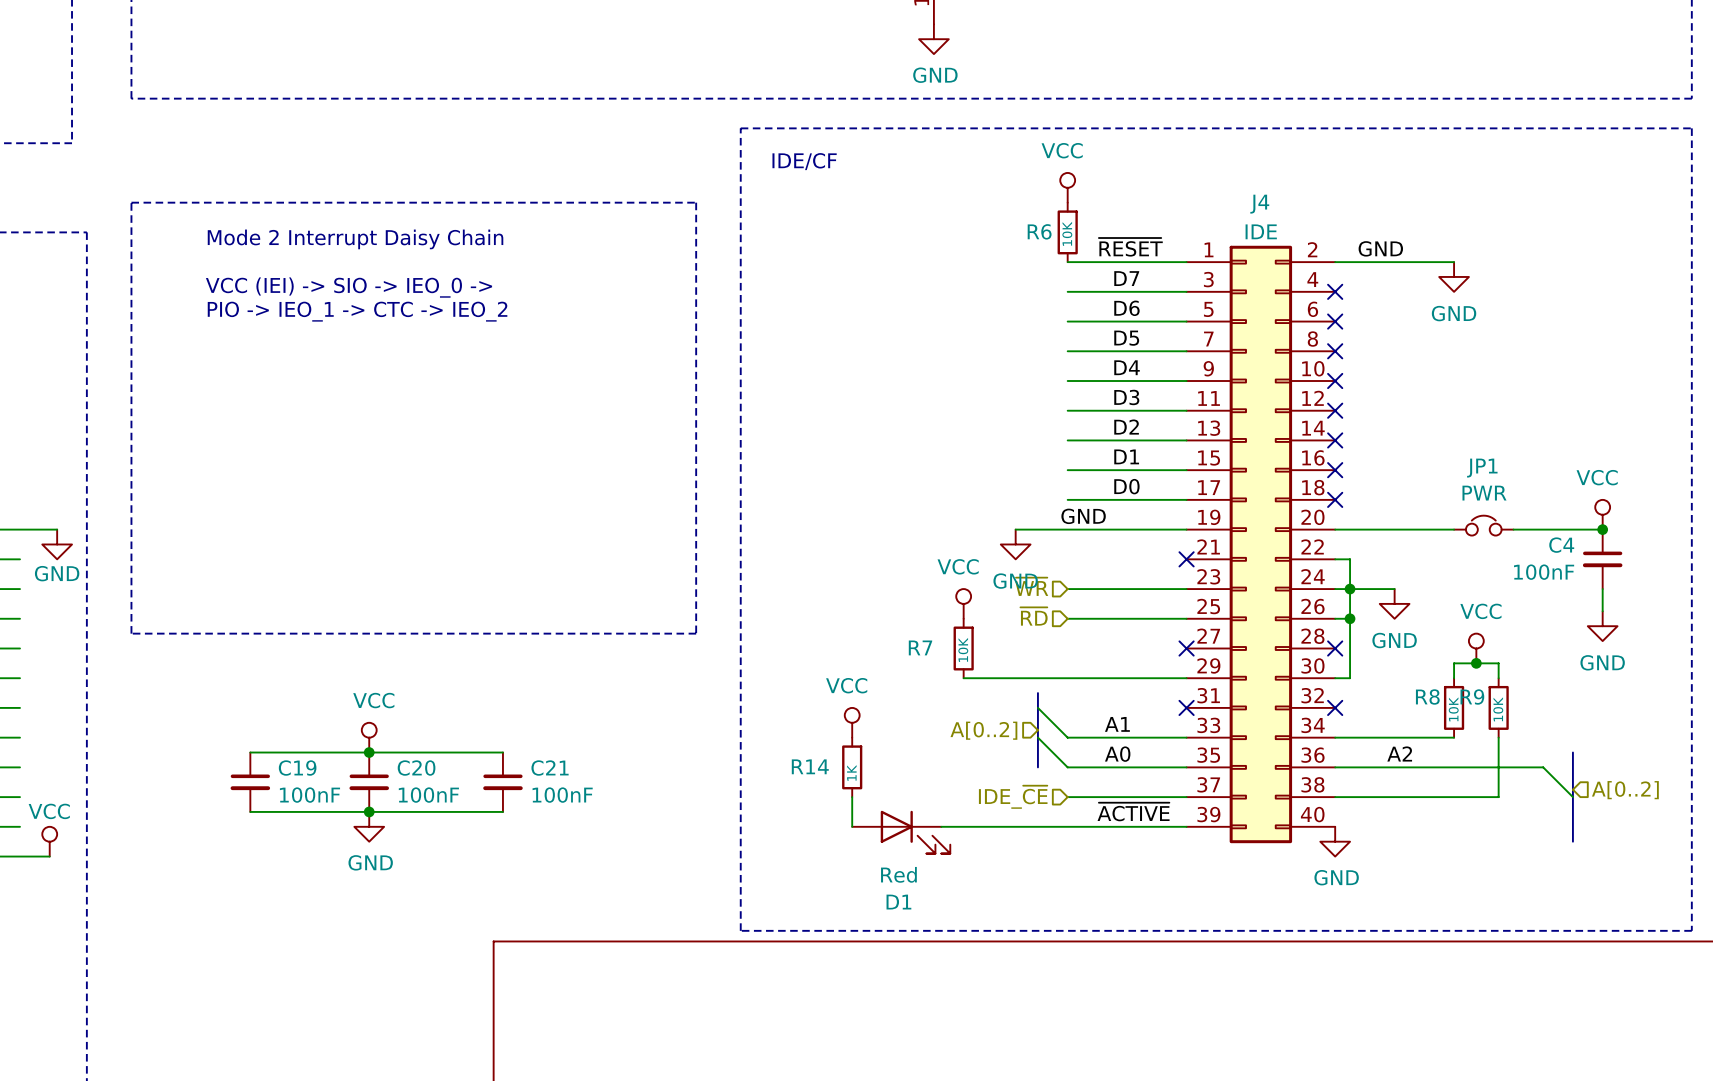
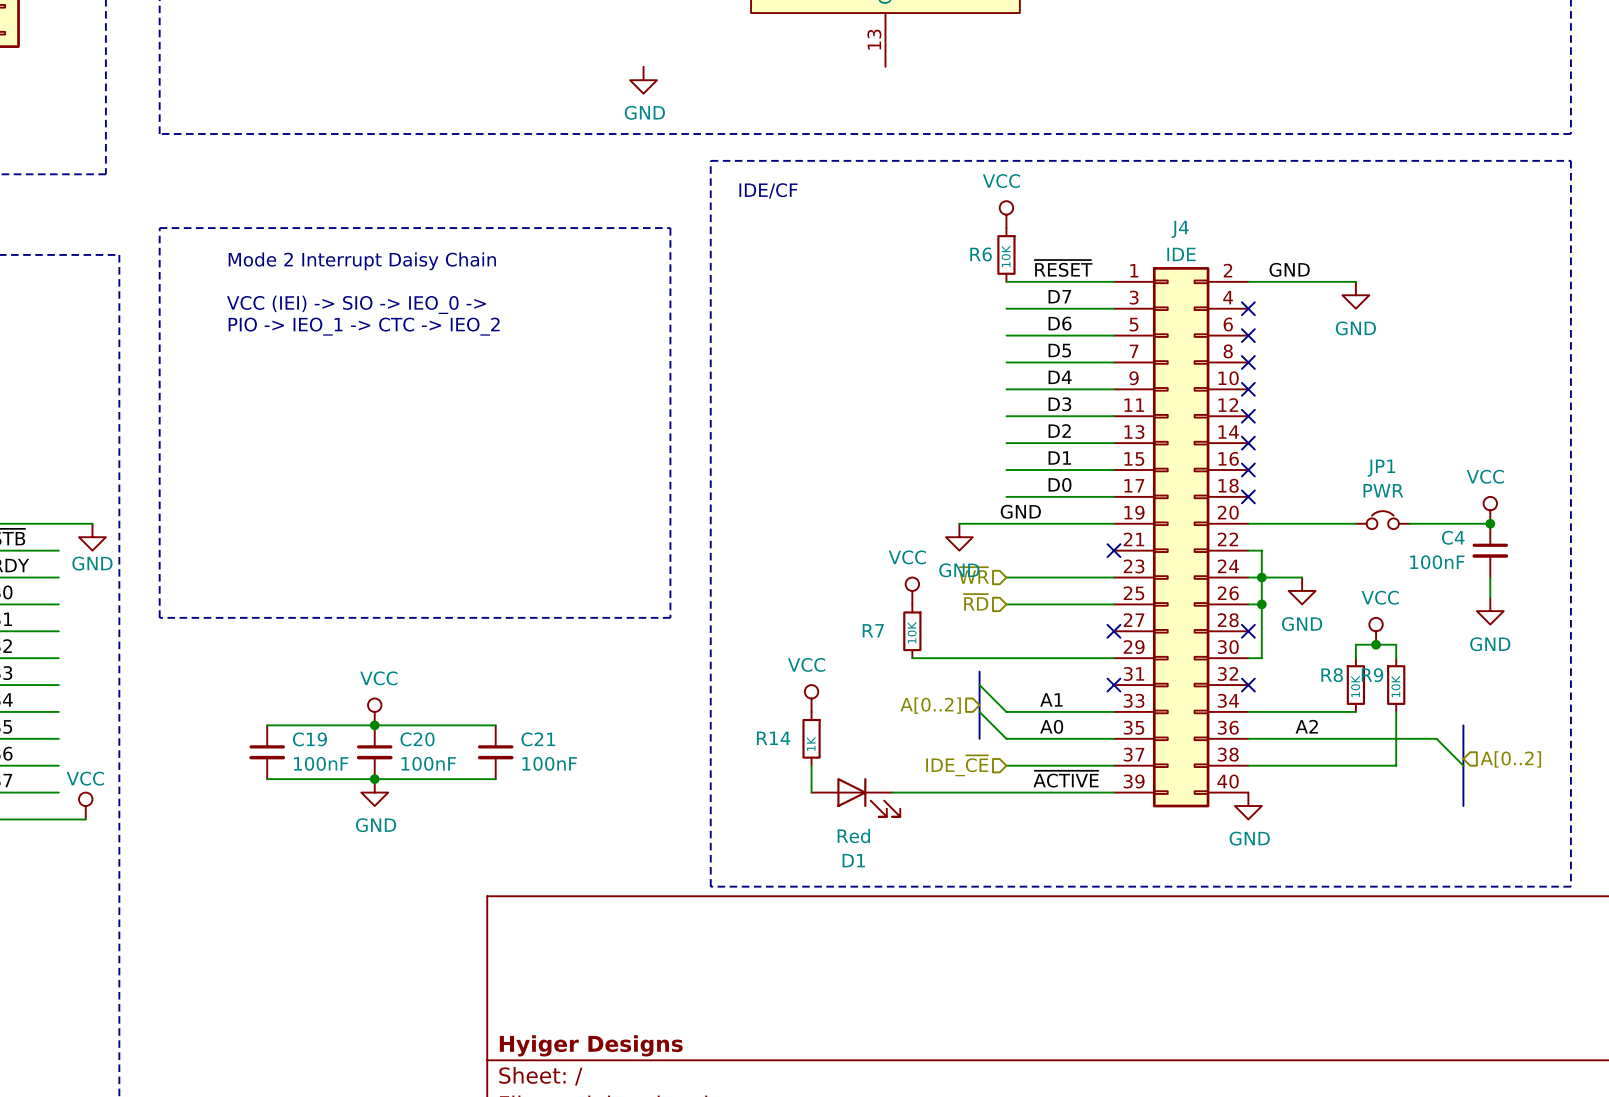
power symbol position: GND (933, 39) -> GND (643, 80)

